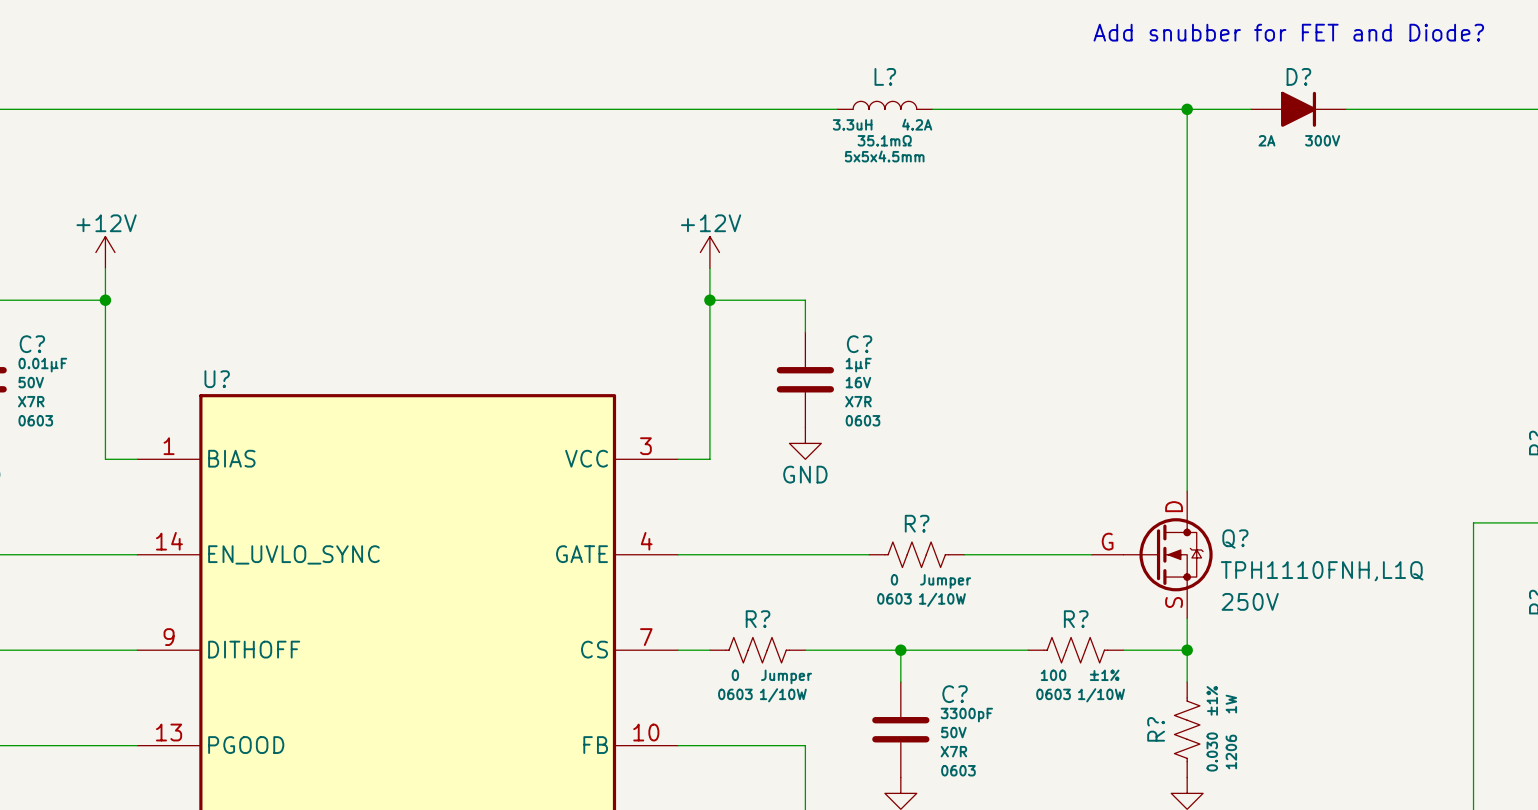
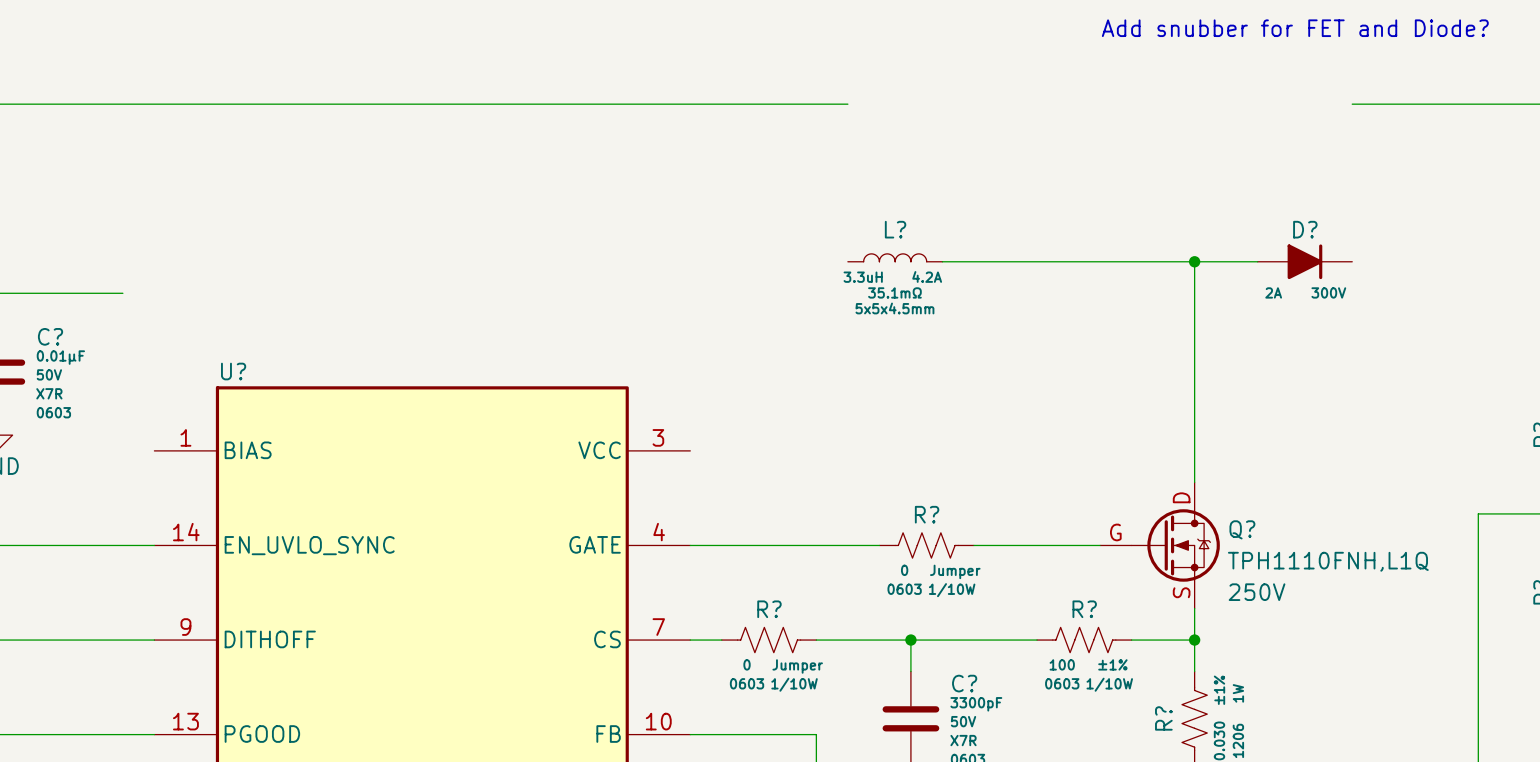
L? position: (884, 105) -> (895, 257)
wire: (932, 109) (1250, 109) -> (942, 261) (1257, 261)
wire: (1187, 109) (1187, 268) -> none
junction: (1187, 109) -> none
D? position: (1298, 109) -> (1304, 261)
power symbol: +12V (105, 252) -> none
power symbol: +12V (709, 252) -> none
wire: (105, 268) (105, 459) (137, 459) -> none
wire: (709, 268) (709, 459) (678, 459) -> none
junction: none -> (1194, 261)
junction: (105, 300) -> none
wire: (709, 300) (805, 300) (805, 332) -> none
junction: (709, 300) -> none
C?: (805, 379) -> none
power symbol: GND (805, 443) -> none

